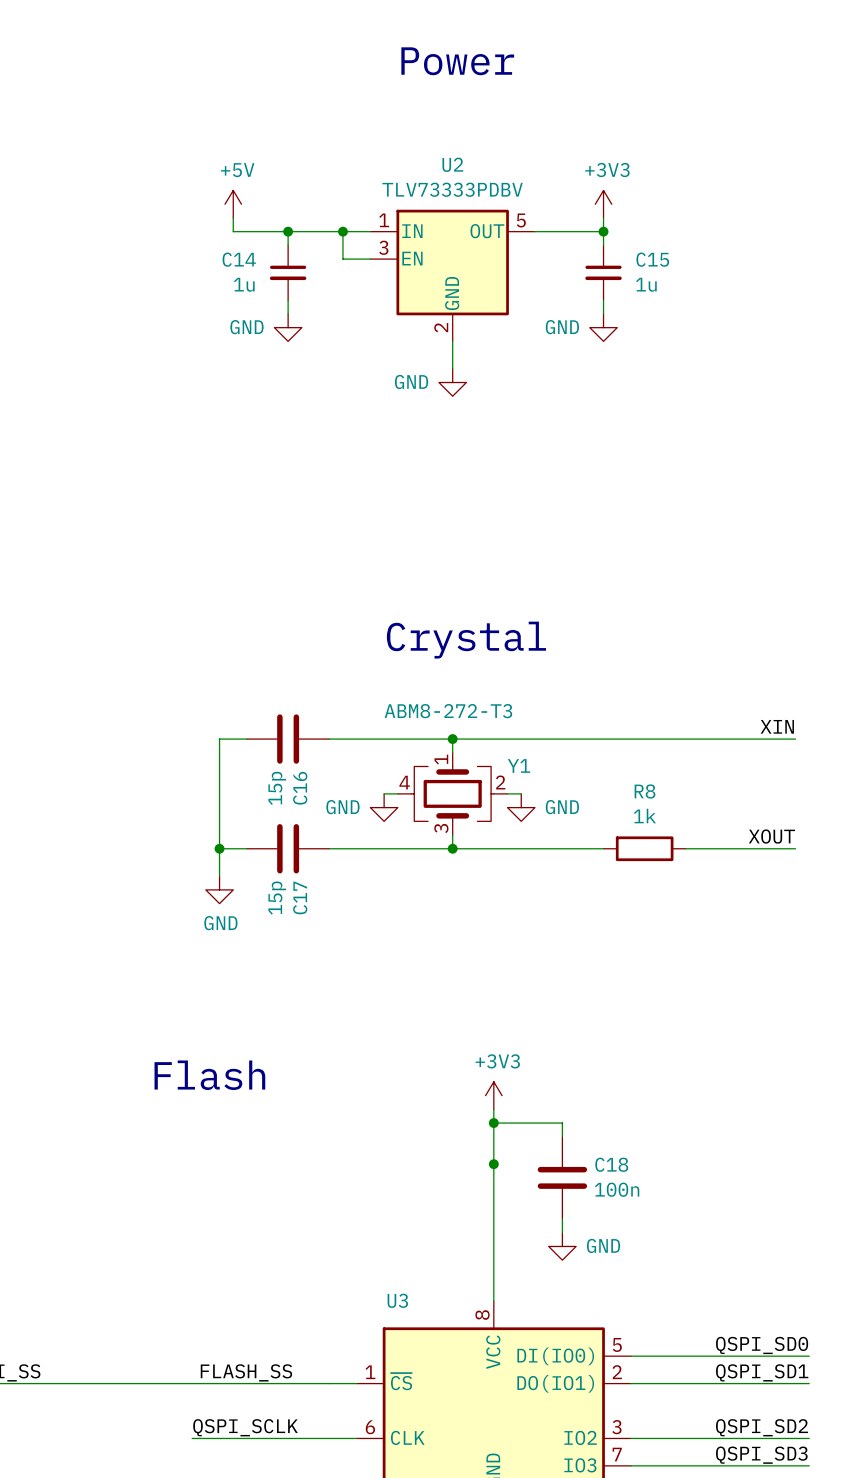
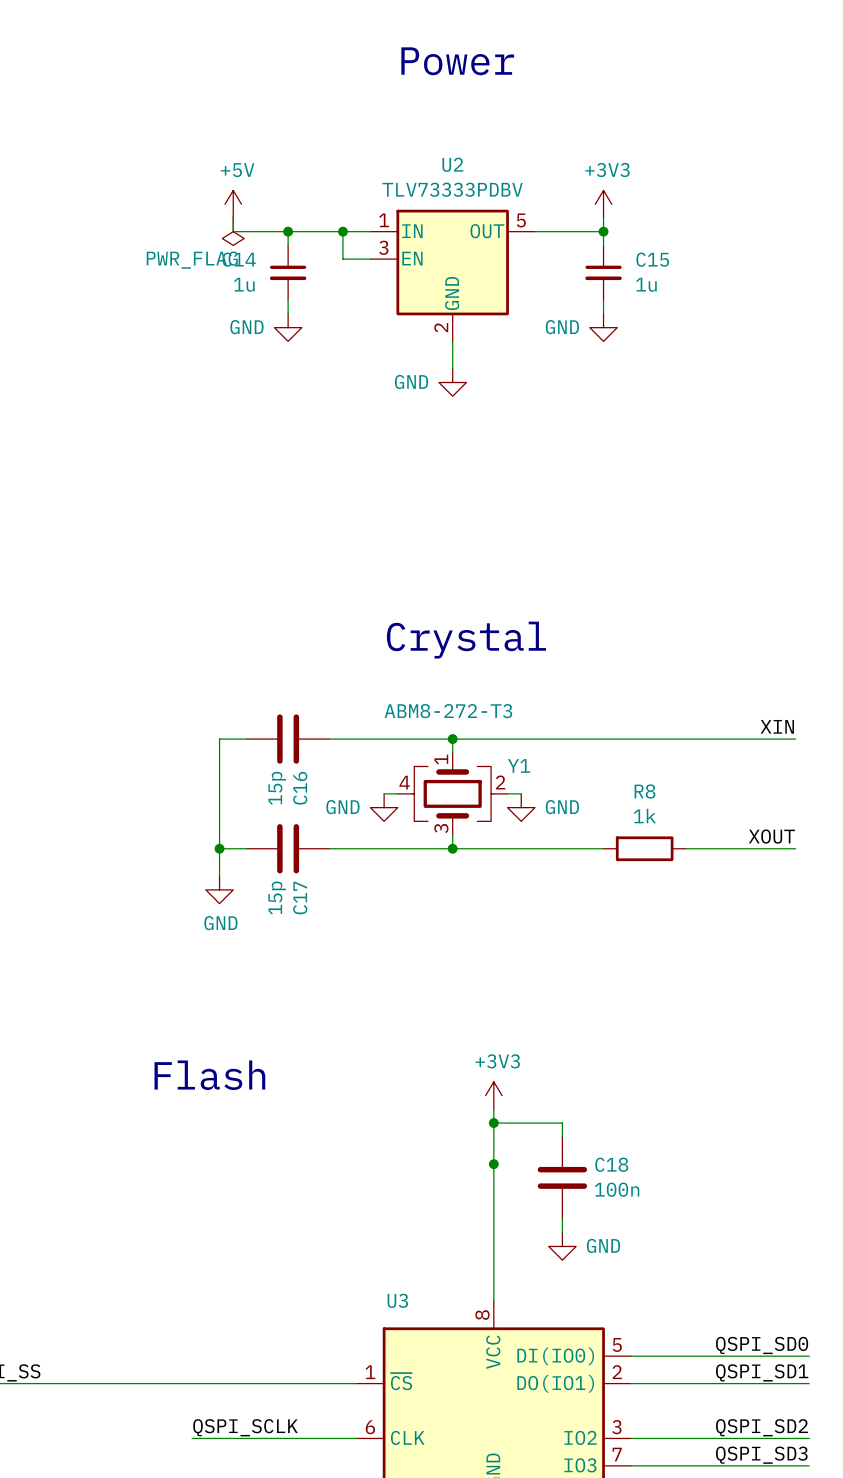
power symbol: none -> PWR_FLAG (233, 231)
label: FLASH_SS (246, 1372) -> none

